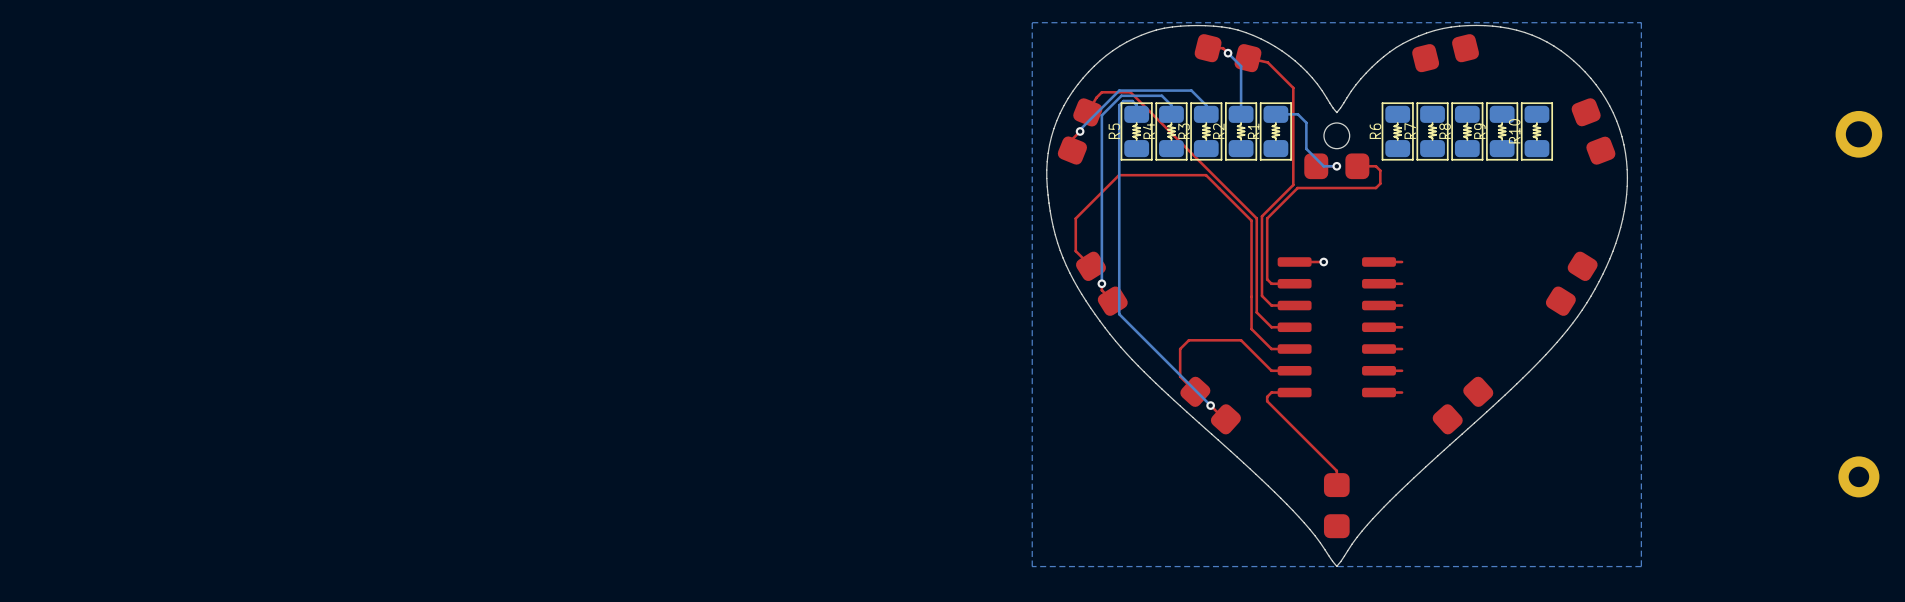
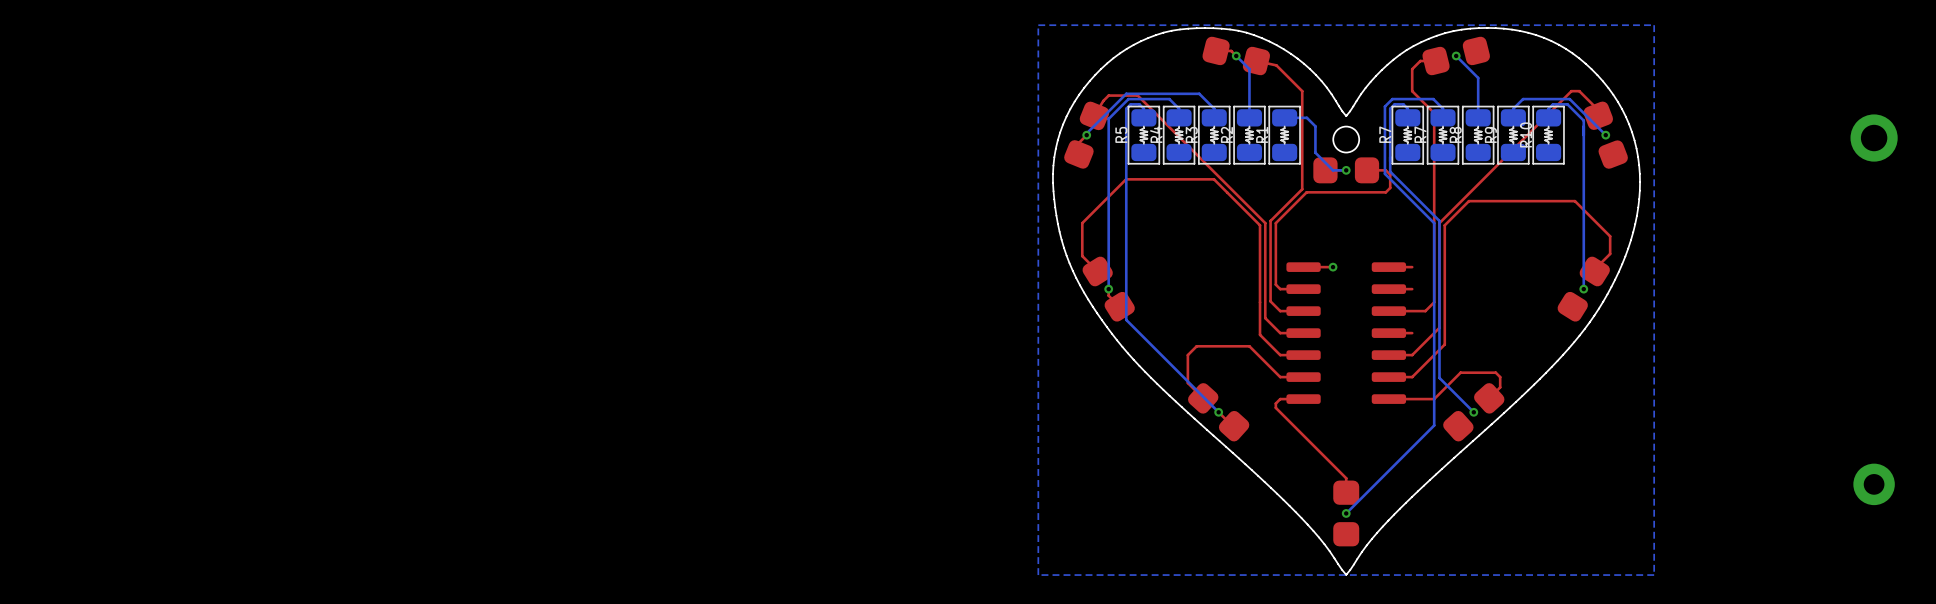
bottom track: none -> (1456, 55) (1478, 77) (1478, 117)
via: none -> (1456, 55)
top track: none -> (1436, 61) (1420, 61) (1412, 69) (1412, 91) (1434, 113) (1434, 302) (1425, 311) (1412, 311)
top track: none -> (1598, 115) (1598, 110) (1579, 91) (1571, 91) (1439, 223) (1439, 327) (1412, 355)
bottom track: none -> (1407, 117) (1407, 108) (1403, 104) (1394, 104) (1390, 108) (1390, 171) (1439, 220) (1439, 377) (1473, 412)
bottom track: none -> (1443, 117) (1443, 108) (1433, 99) (1392, 99) (1384, 106) (1384, 173) (1434, 223) (1434, 425) (1346, 513)
bottom track: none -> (1513, 117) (1513, 108) (1523, 99) (1569, 99) (1605, 135)
bottom track: none -> (1548, 117) (1548, 108) (1552, 104) (1567, 104) (1583, 120) (1583, 289)
R6 name: R6 (1375, 131) -> R7 (1385, 134)
via: none -> (1605, 135)
top track: none -> (1594, 271) (1610, 253) (1610, 236) (1574, 201) (1468, 201) (1444, 225) (1444, 344) (1412, 377)
via: none -> (1583, 289)
top track: none -> (1489, 398) (1500, 387) (1500, 377) (1495, 372) (1460, 372) (1434, 399) (1412, 399)
via: none -> (1473, 412)
via: none -> (1346, 513)

